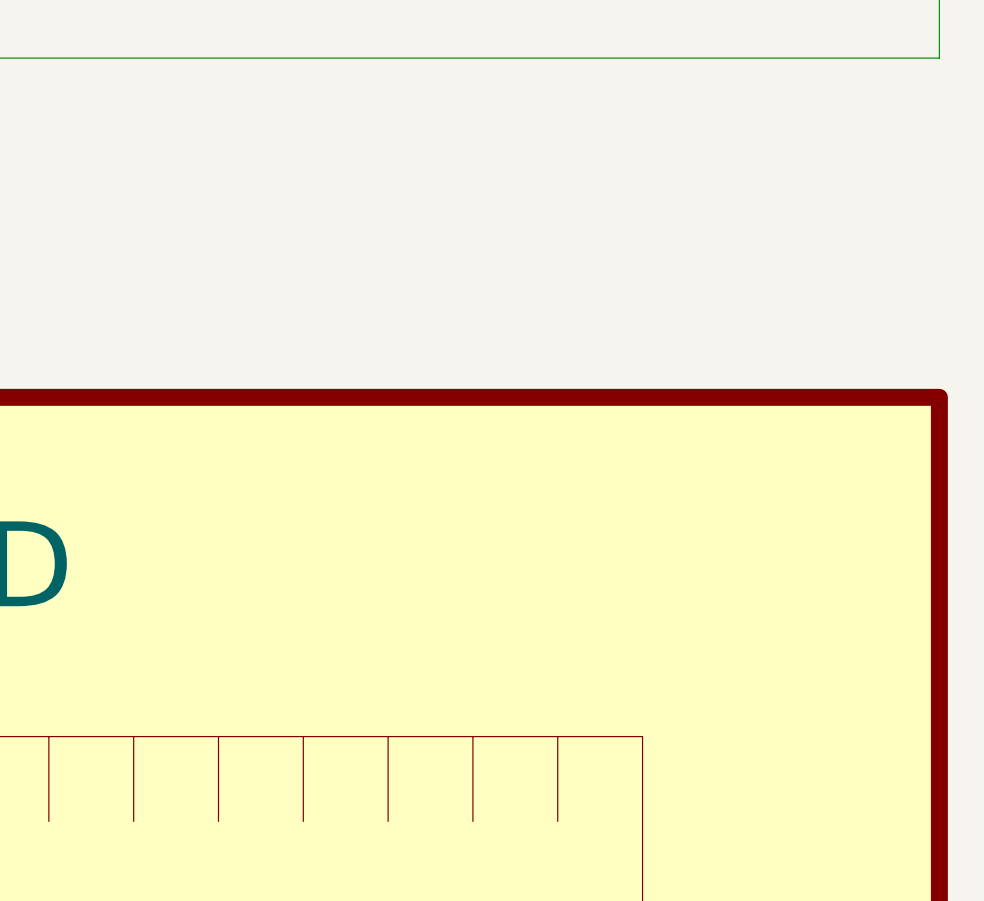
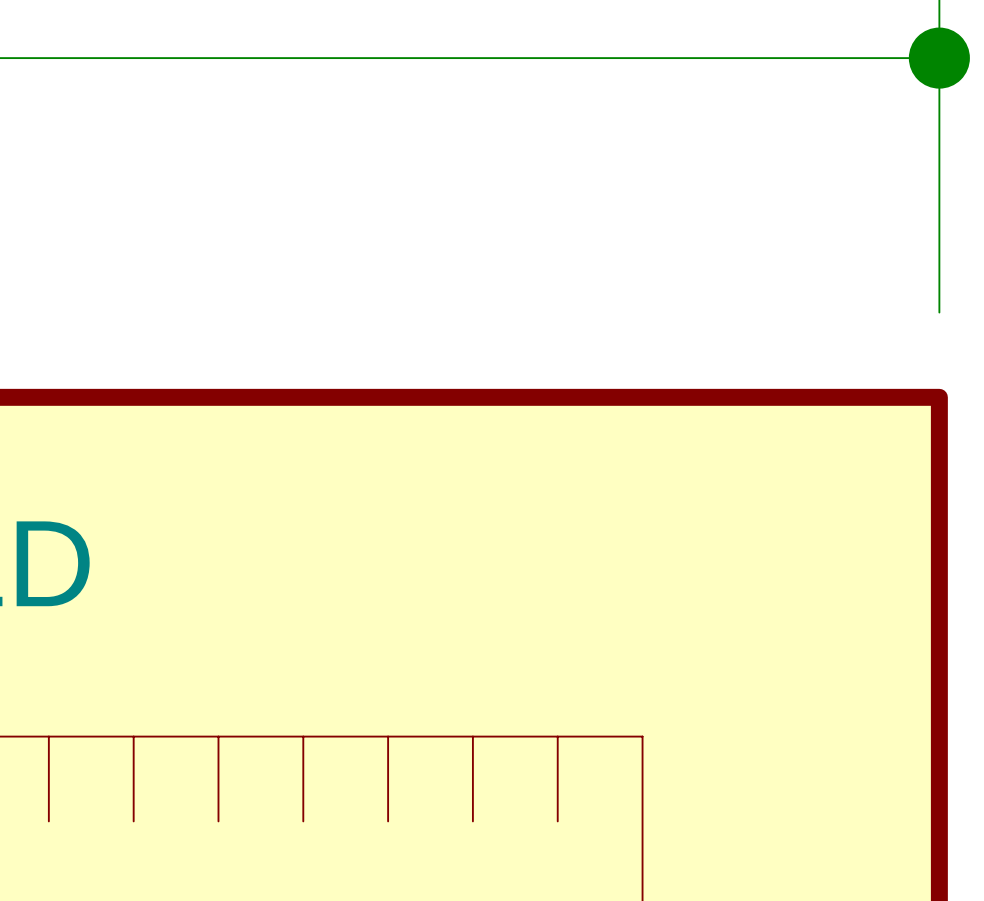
wire: none -> (939, 58) (939, 312)
junction: none -> (939, 58)

